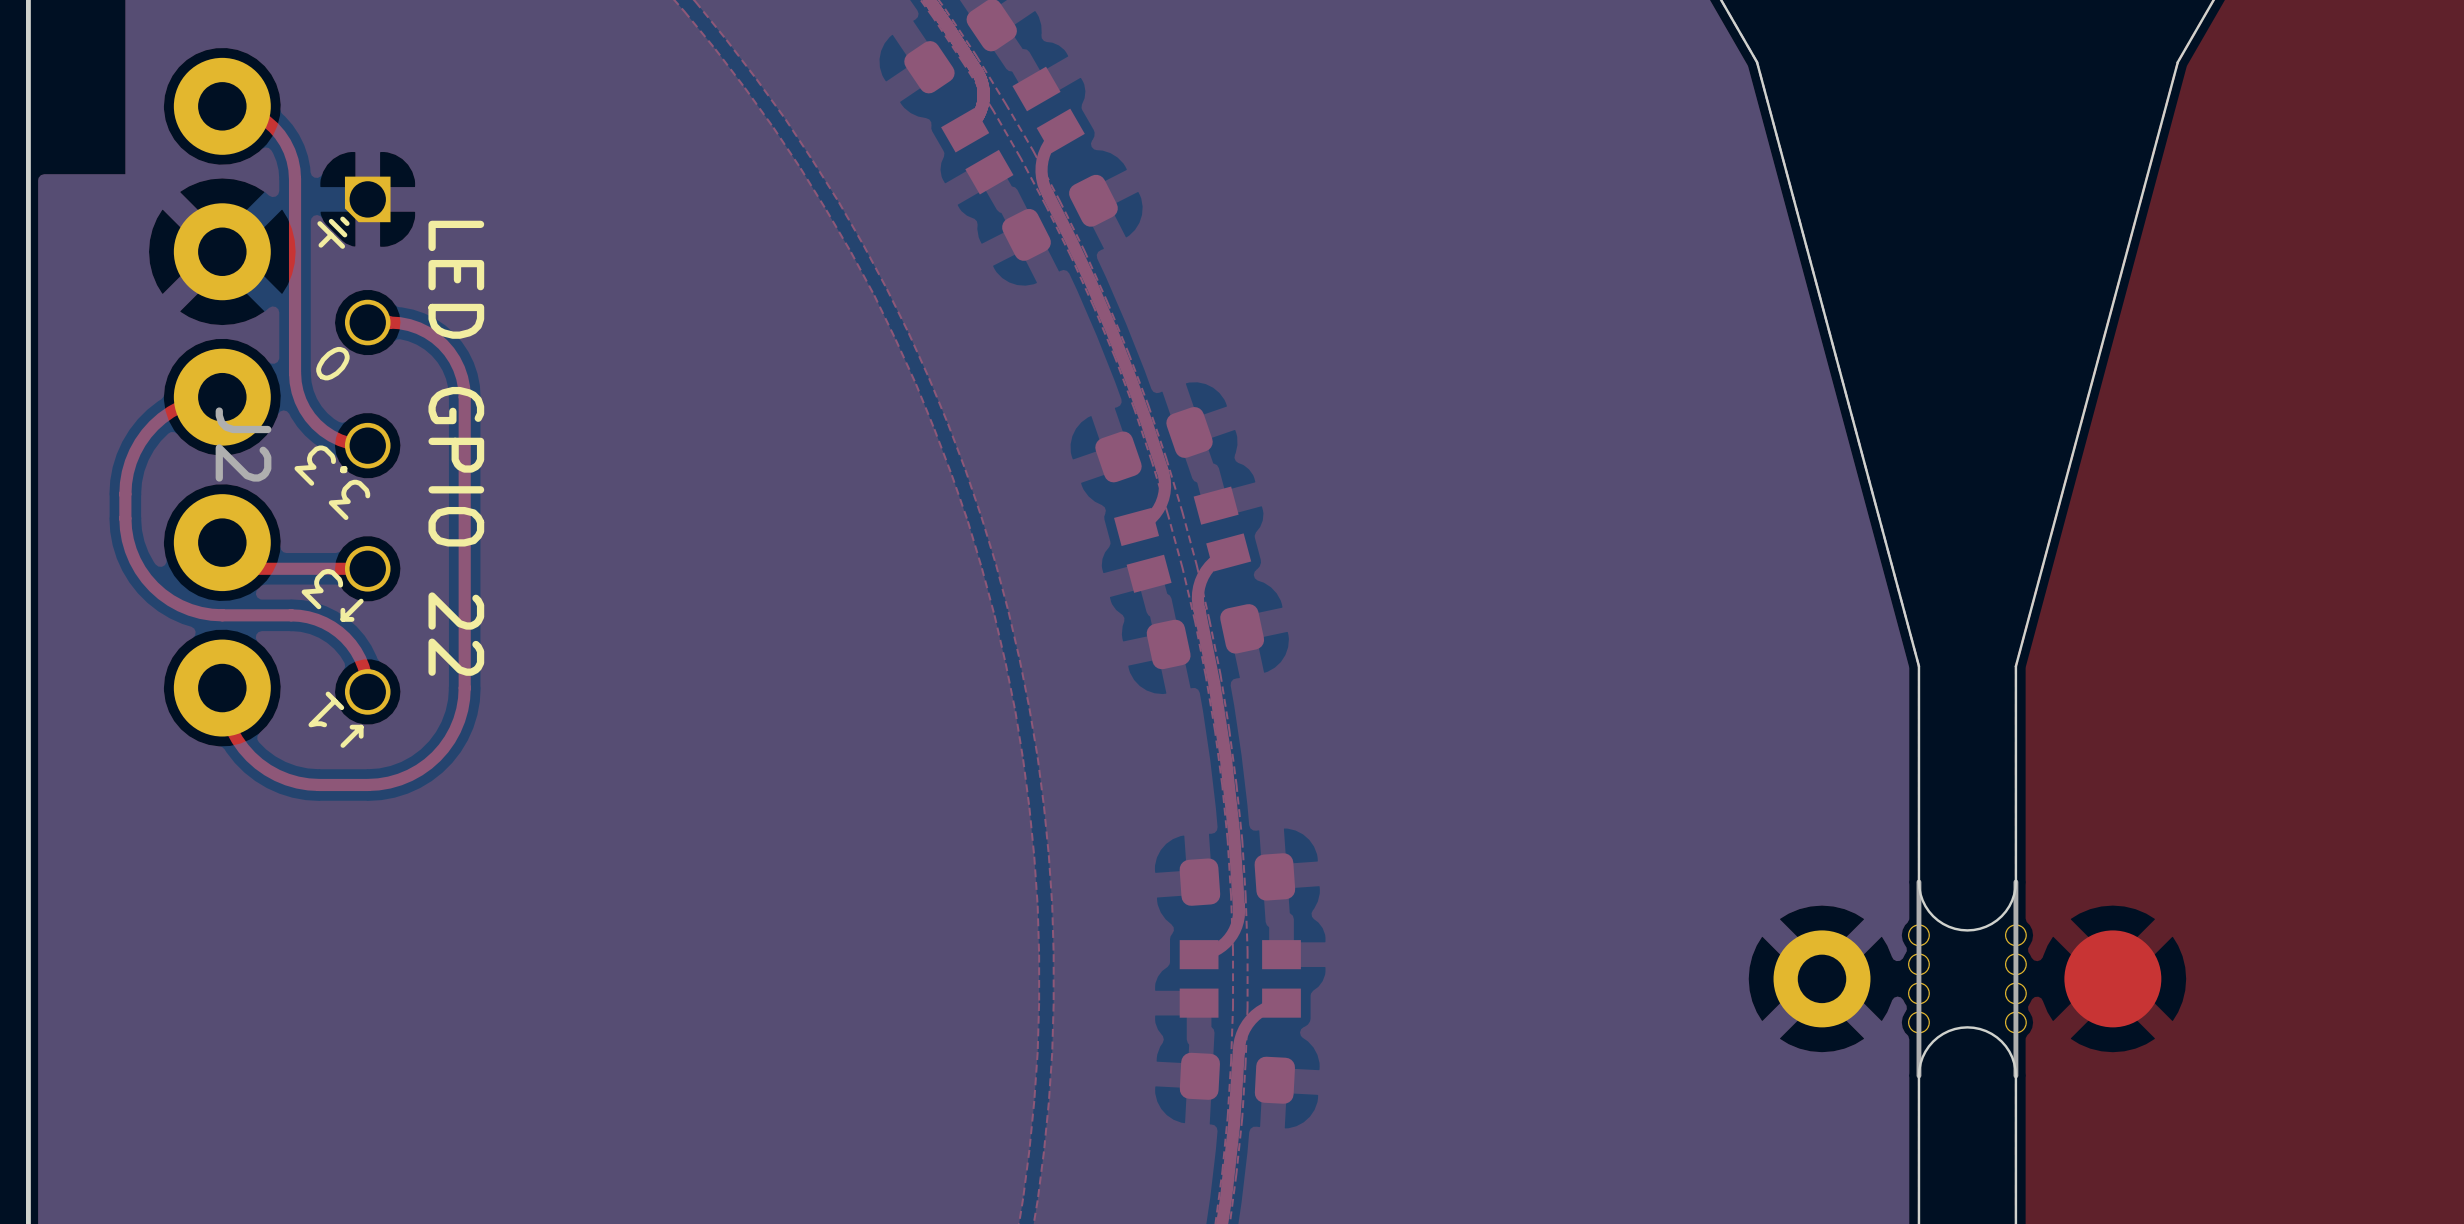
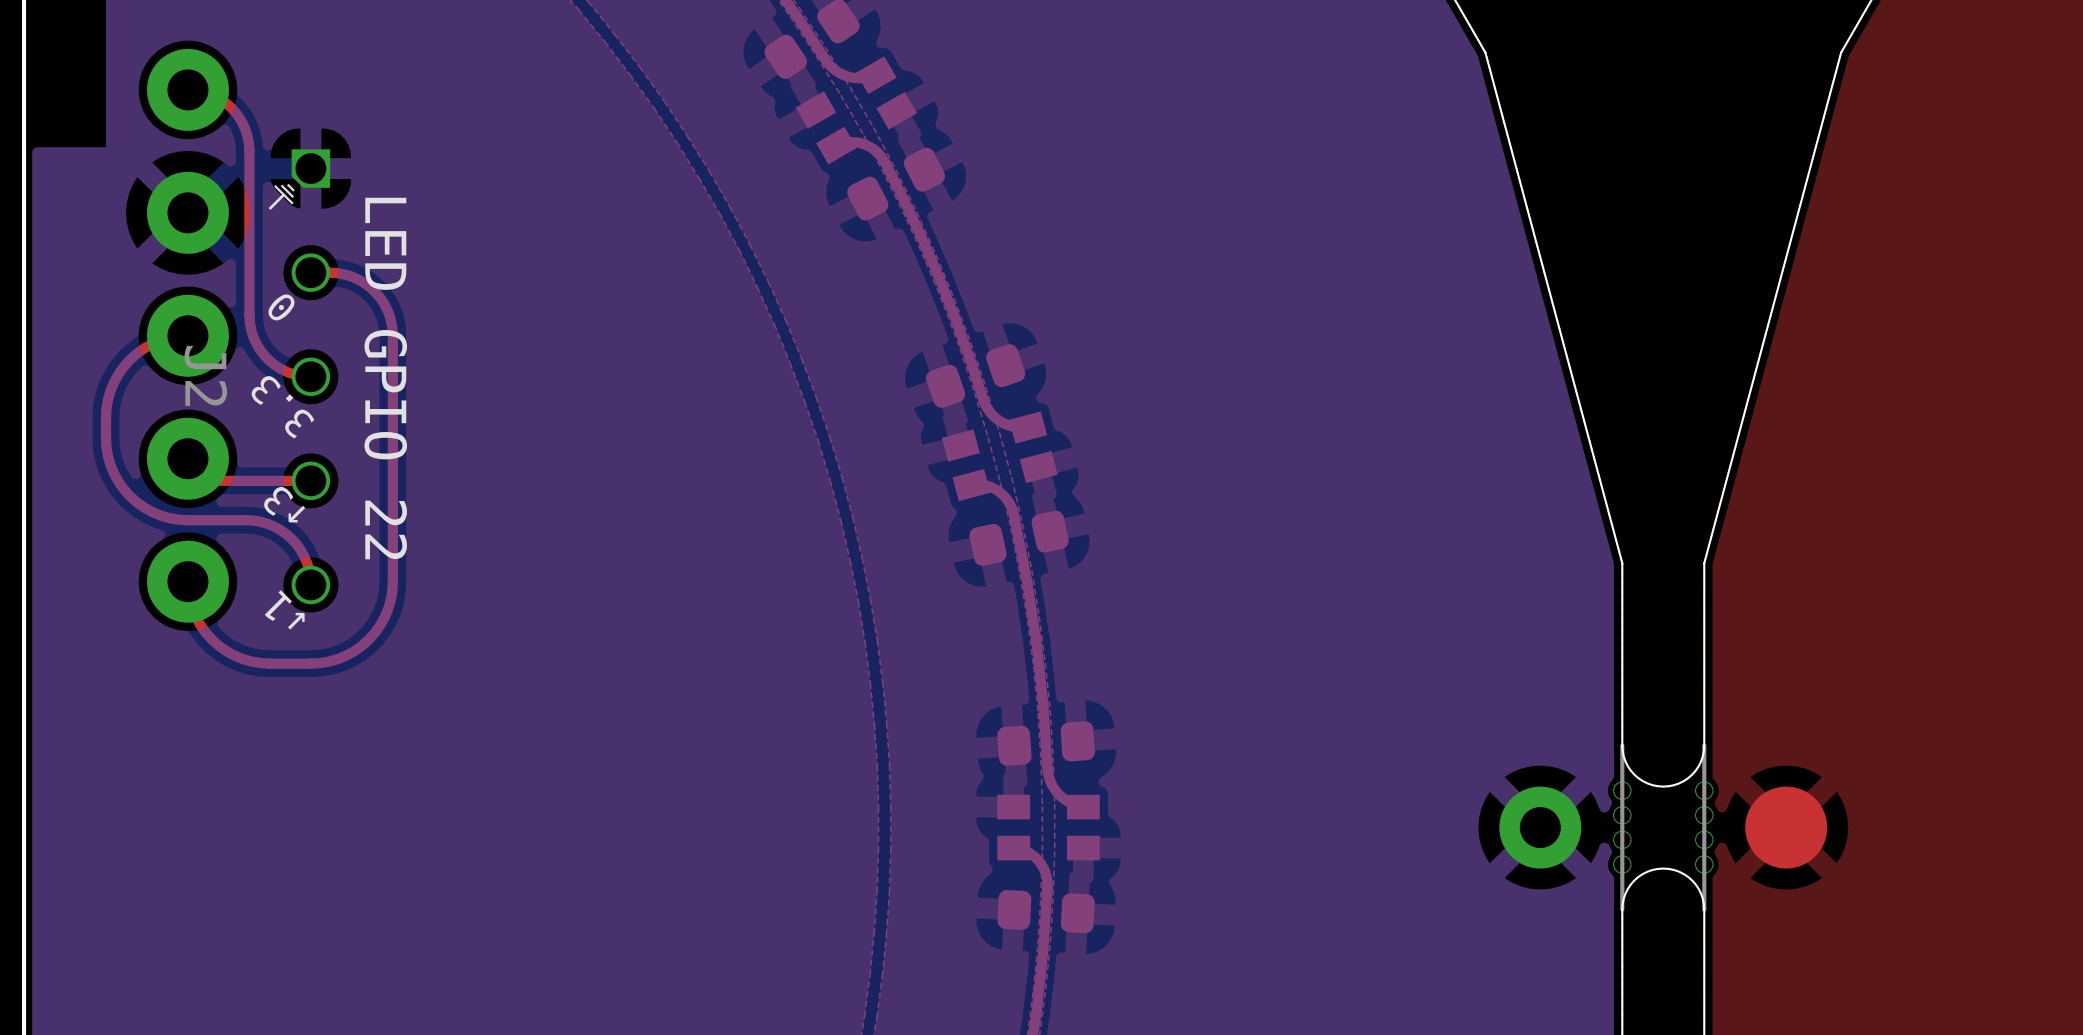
top track: (975, 68) (983, 86) (983, 101) (975, 119) (965, 130) -> (824, 57) (833, 69) (846, 76) (861, 78) (876, 74)
top track: (975, 68) (983, 86) (983, 101) (975, 119) (965, 130) -> none
top track: (975, 68) (983, 86) (983, 101) (975, 119) (965, 130) -> none
top track: (1060, 131) (1049, 144) (1042, 160) (1042, 177) (1047, 194) -> (836, 145) (850, 142) (864, 144) (877, 152) (885, 164)
top track: (1162, 469) (1165, 487) (1161, 503) (1151, 518) (1136, 527) -> (982, 397) (988, 410) (999, 420) (1012, 426) (1027, 427)
top track: (1228, 553) (1213, 562) (1203, 576) (1198, 593) (1199, 610) -> (971, 484) (985, 485) (999, 491) (1008, 502) (1014, 516)
top track: (1238, 906) (1237, 921) (1229, 938) (1213, 951) (1199, 955) -> (1047, 766) (1050, 780) (1057, 793) (1069, 802) (1083, 806)
top track: (1281, 1003) (1264, 1008) (1251, 1019) (1242, 1034) (1238, 1051) -> (1013, 847) (1029, 853) (1039, 861) (1045, 872) (1047, 889)

